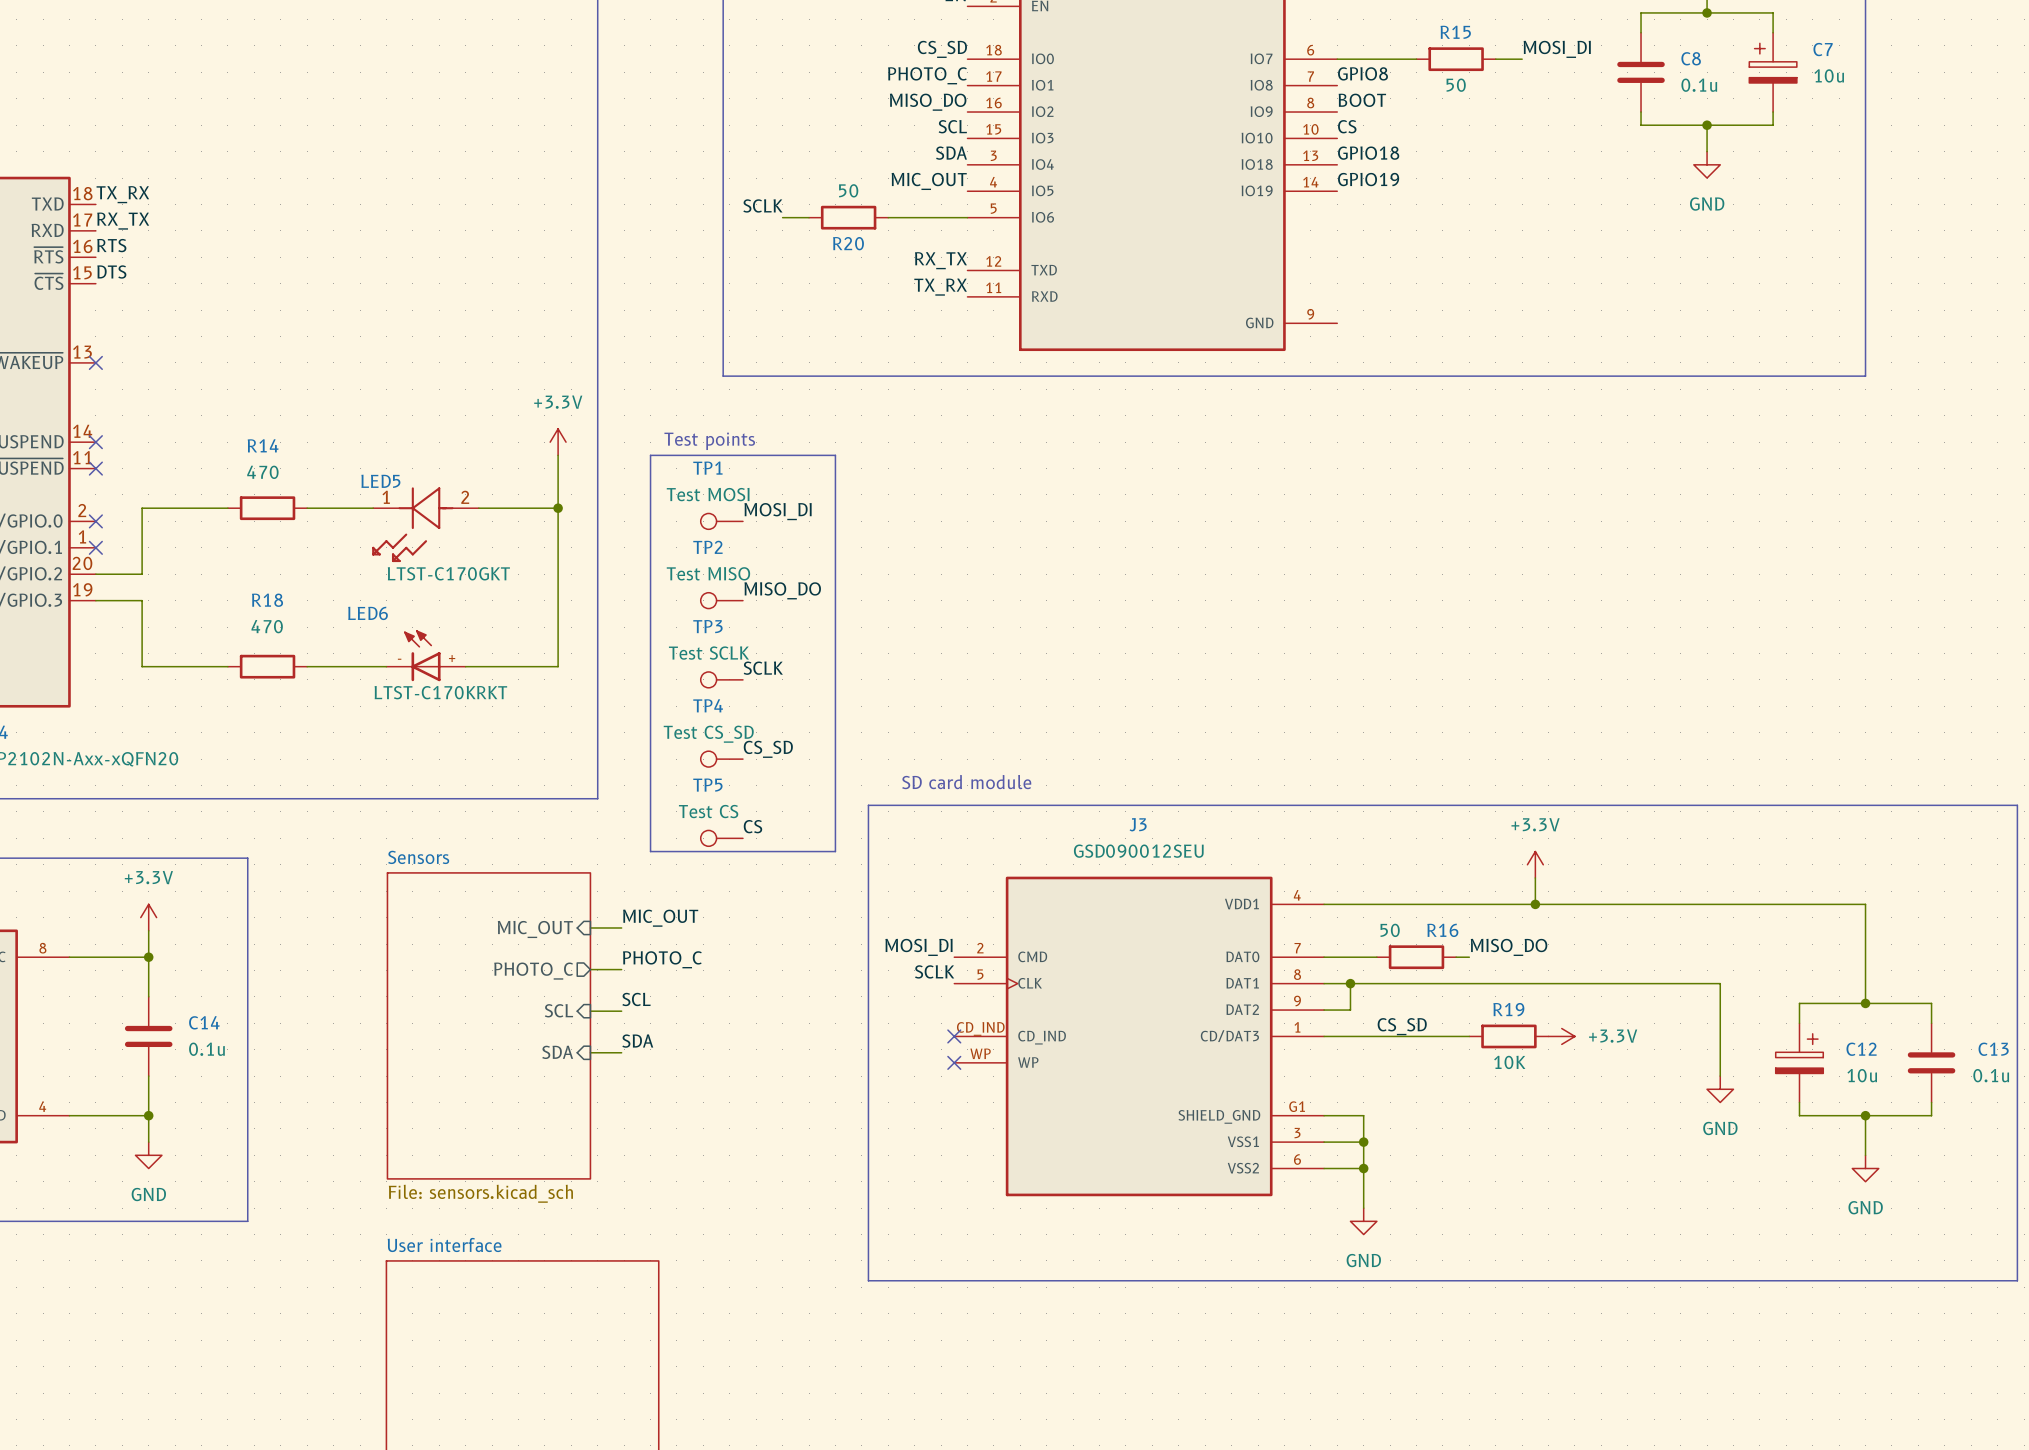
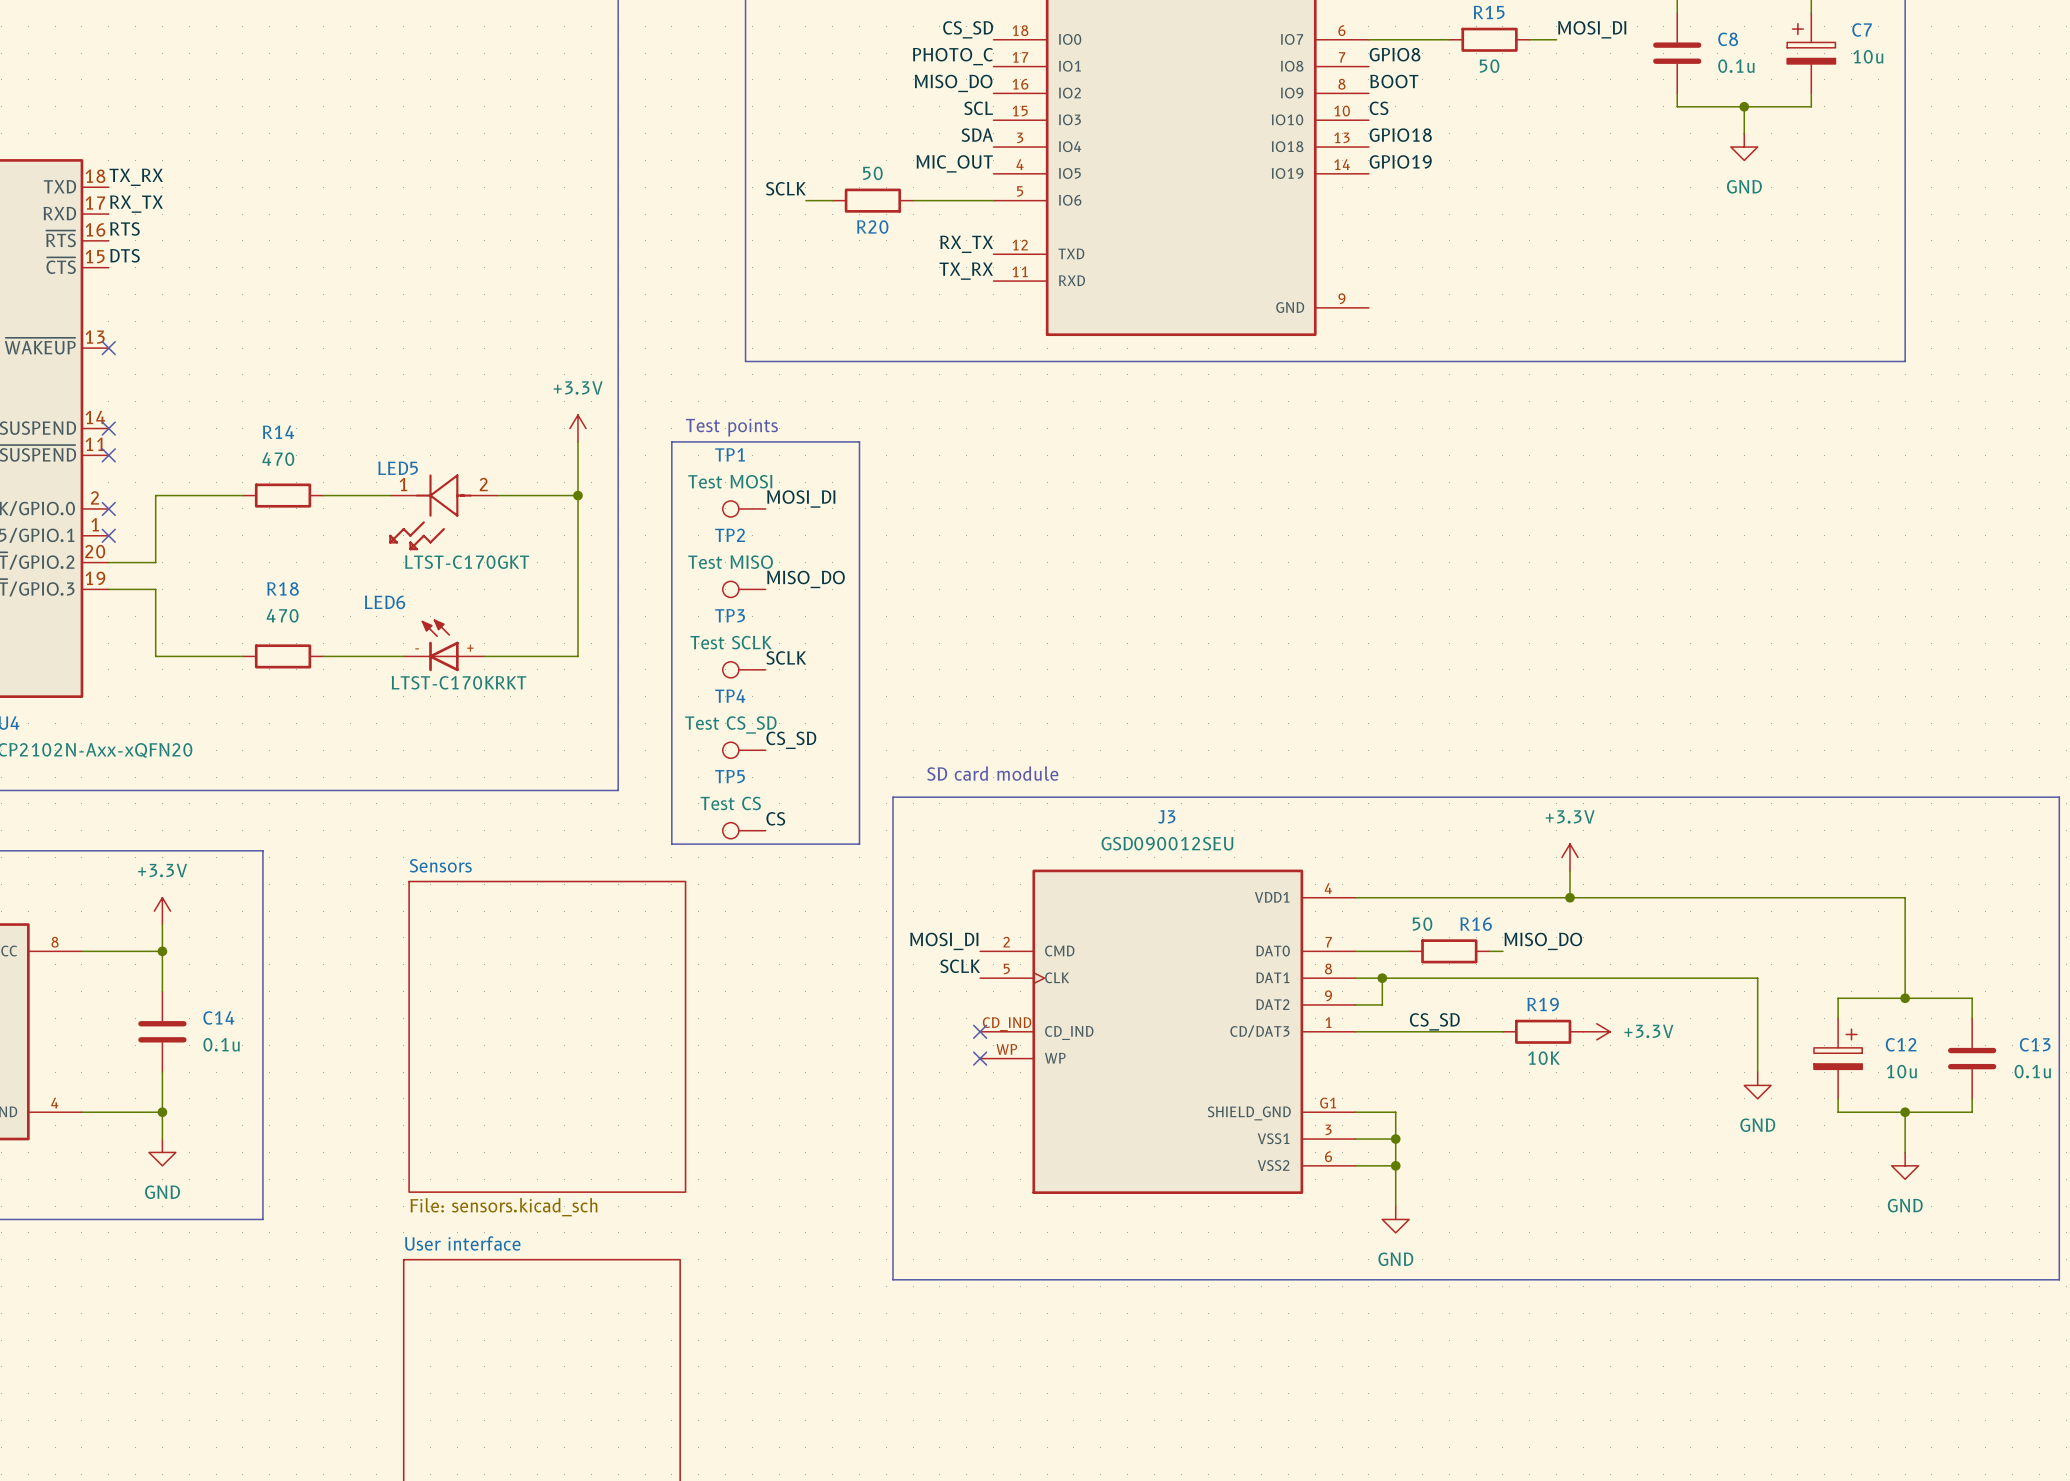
label: MIC_OUT (660, 918) -> none
wire: (590, 927) (621, 927) -> none
sheet pin: MIC_OUT (535, 929) -> none
label: PHOTO_C (662, 959) -> none
wire: (590, 969) (621, 969) -> none
sheet pin: PHOTO_C (533, 971) -> none
label: SCL (636, 999) -> none
sheet pin: SCL (558, 1010) -> none
wire: (590, 1011) (621, 1011) -> none
sheet Sensors: File: sensors.kicad_sch (488, 1025) -> none
sheet Sensors: none -> File: sensors.kicad_sch (547, 1036)
label: SDA (637, 1041) -> none
sheet pin: SDA (557, 1052) -> none
wire: (590, 1052) (621, 1052) -> none

